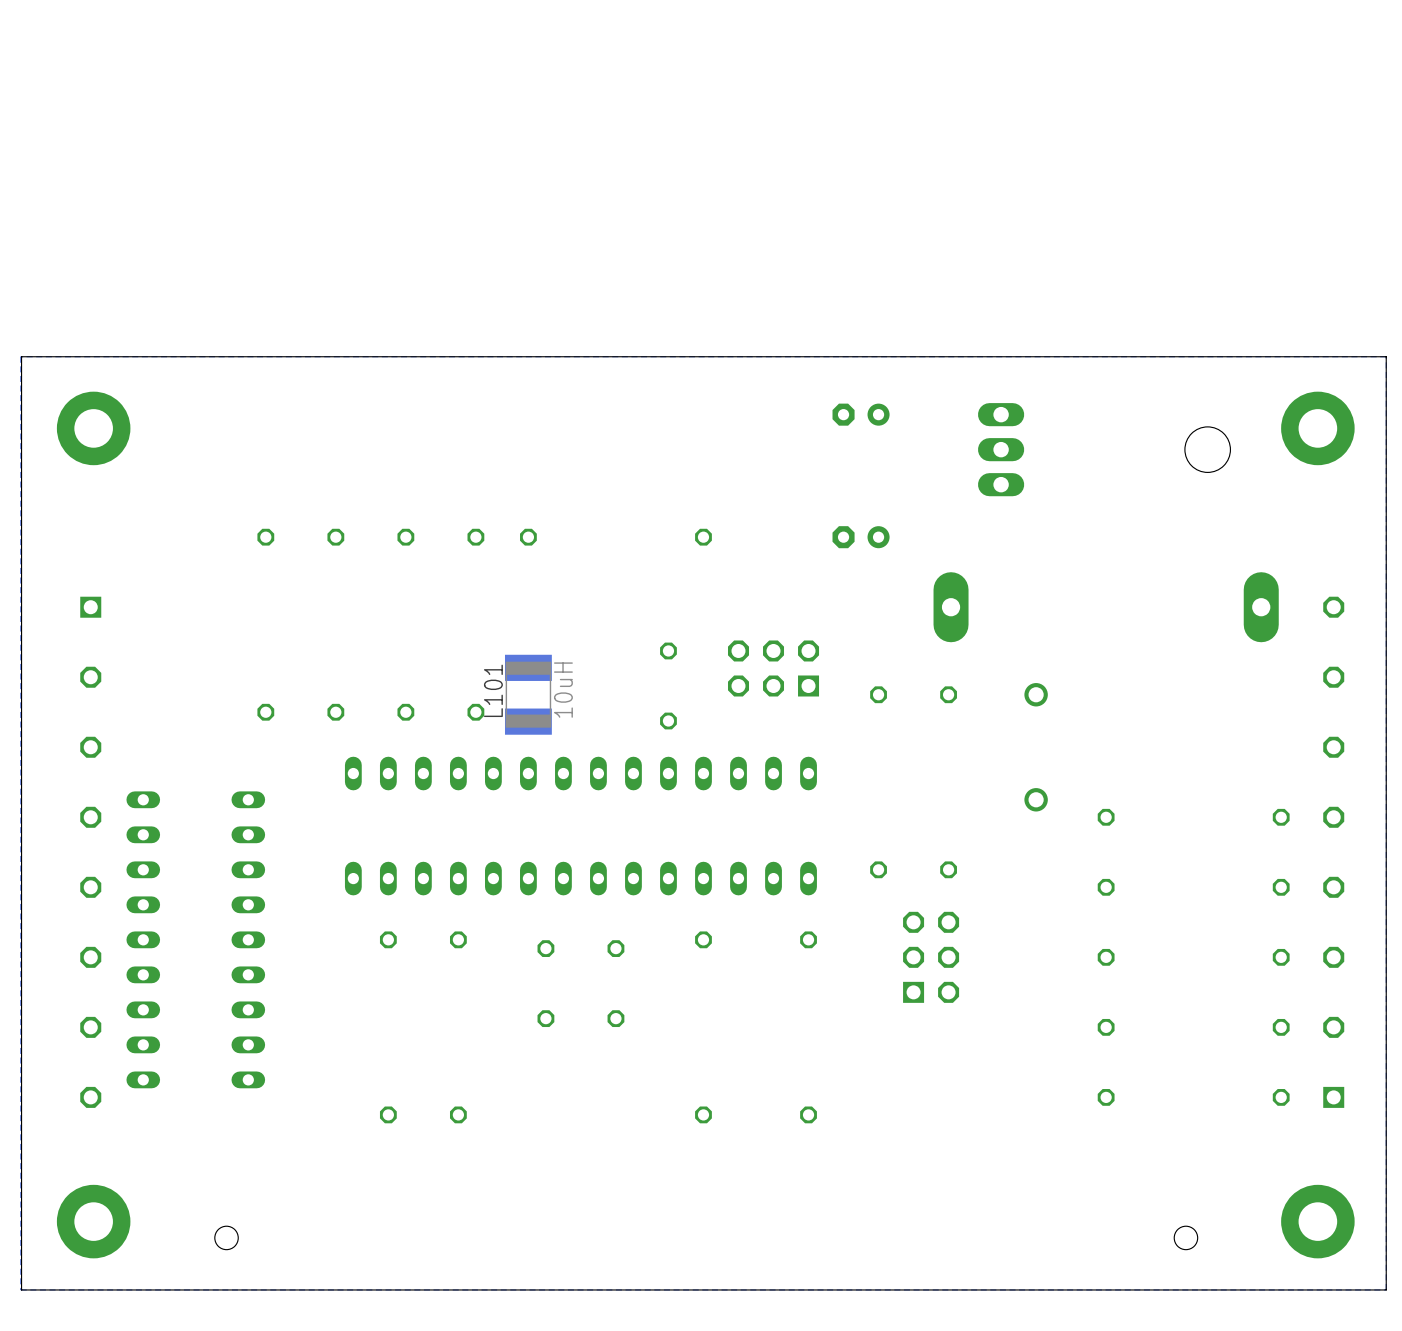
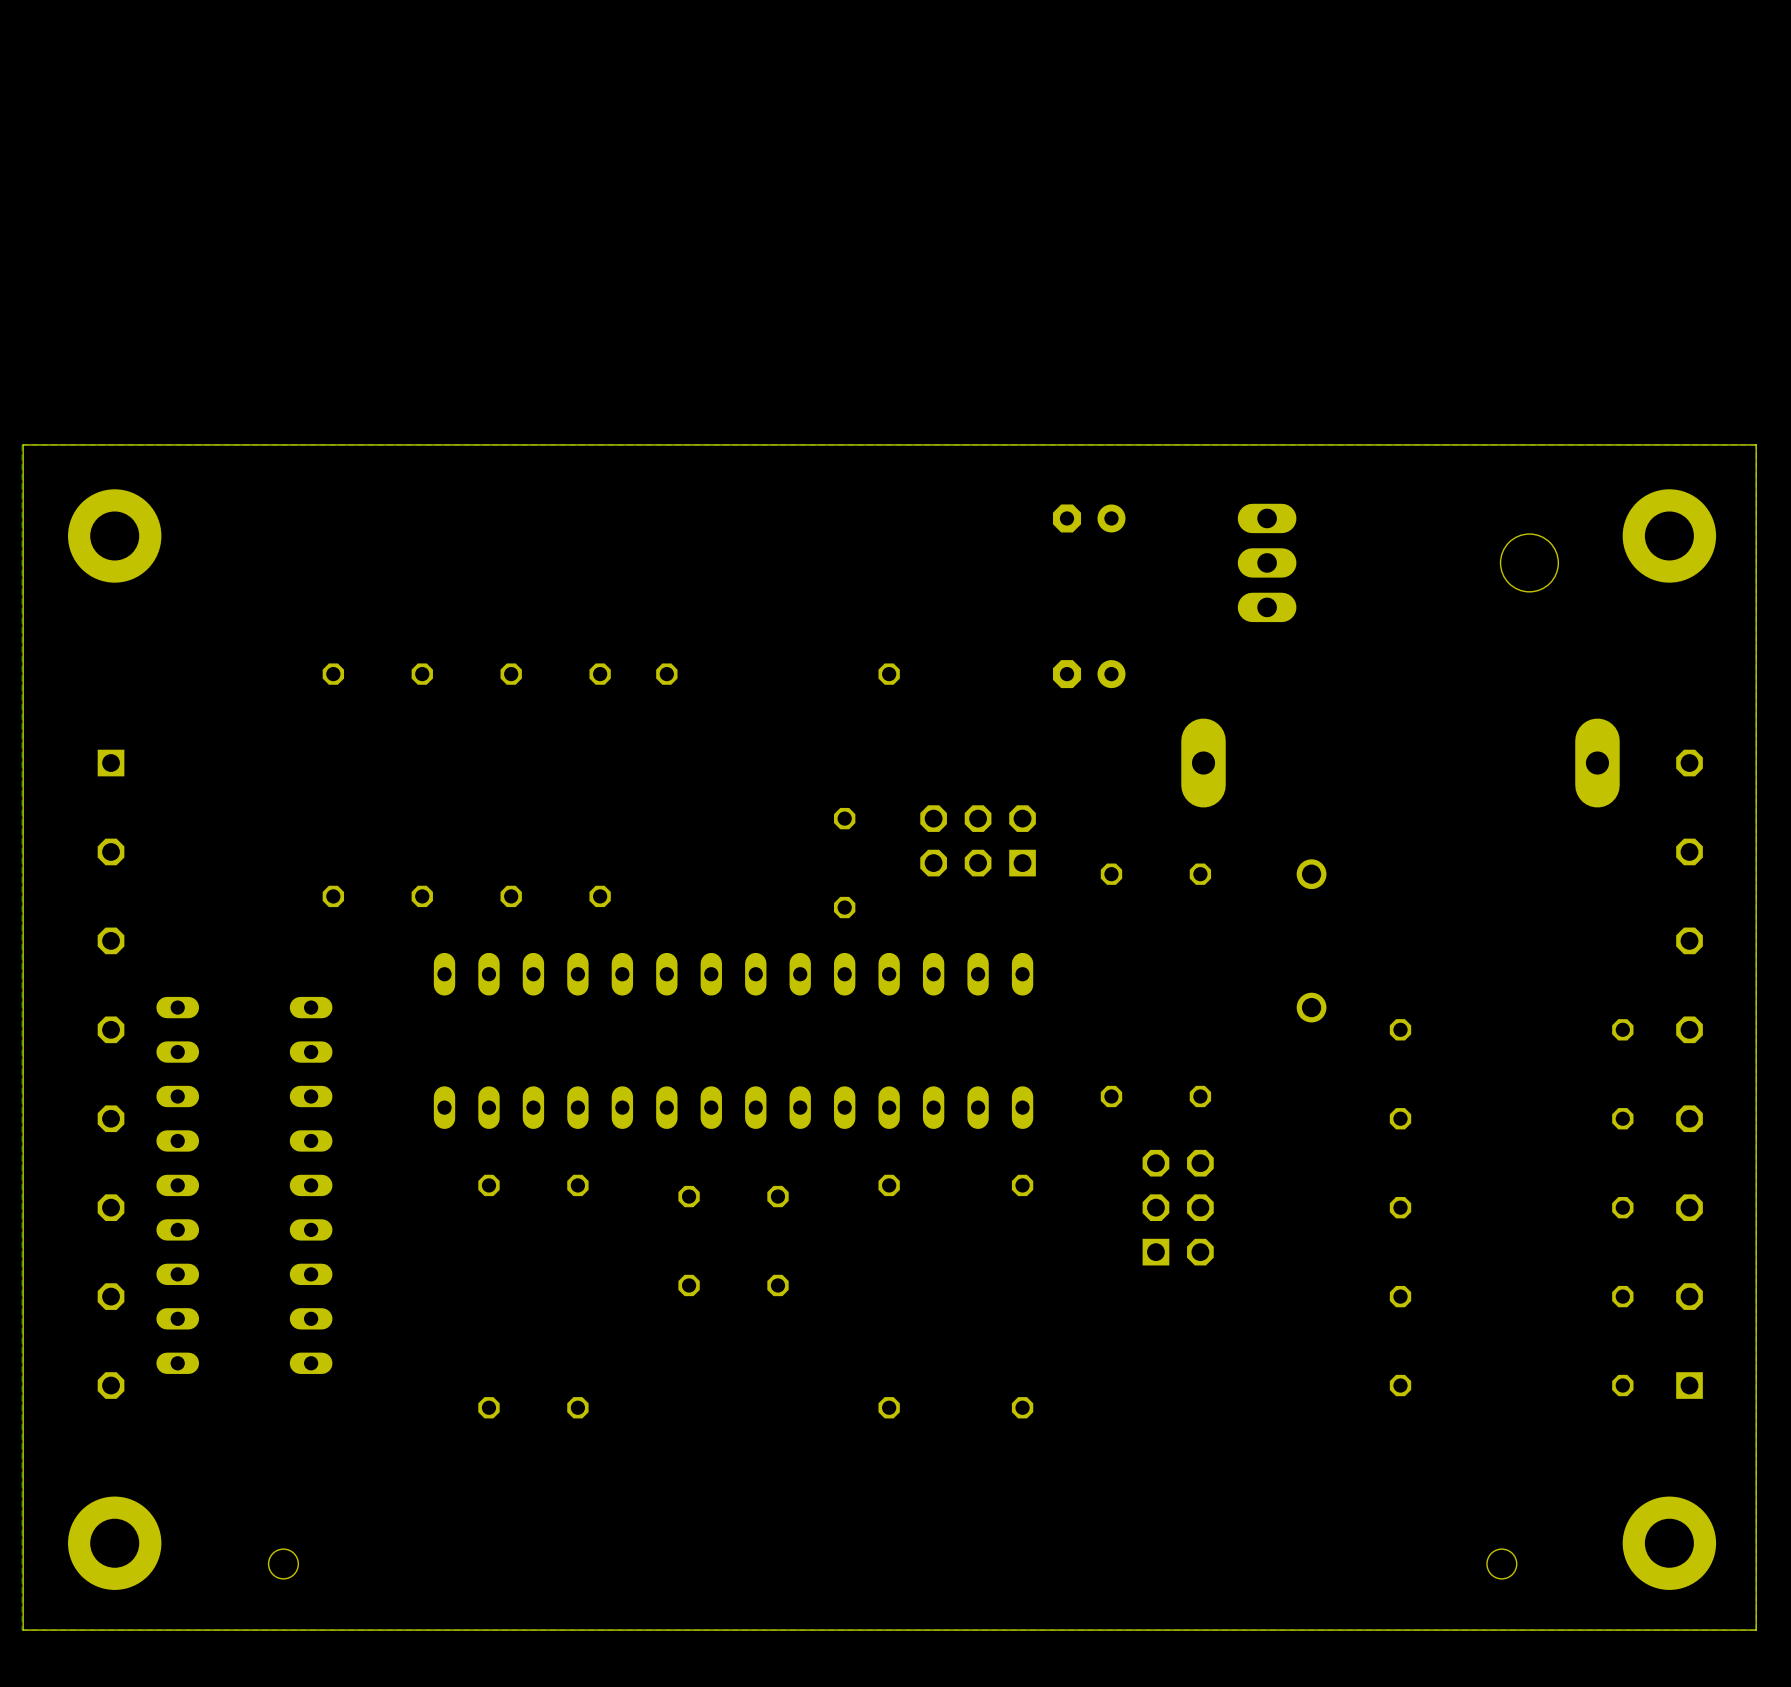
L101: 10uH (528, 694) -> none

